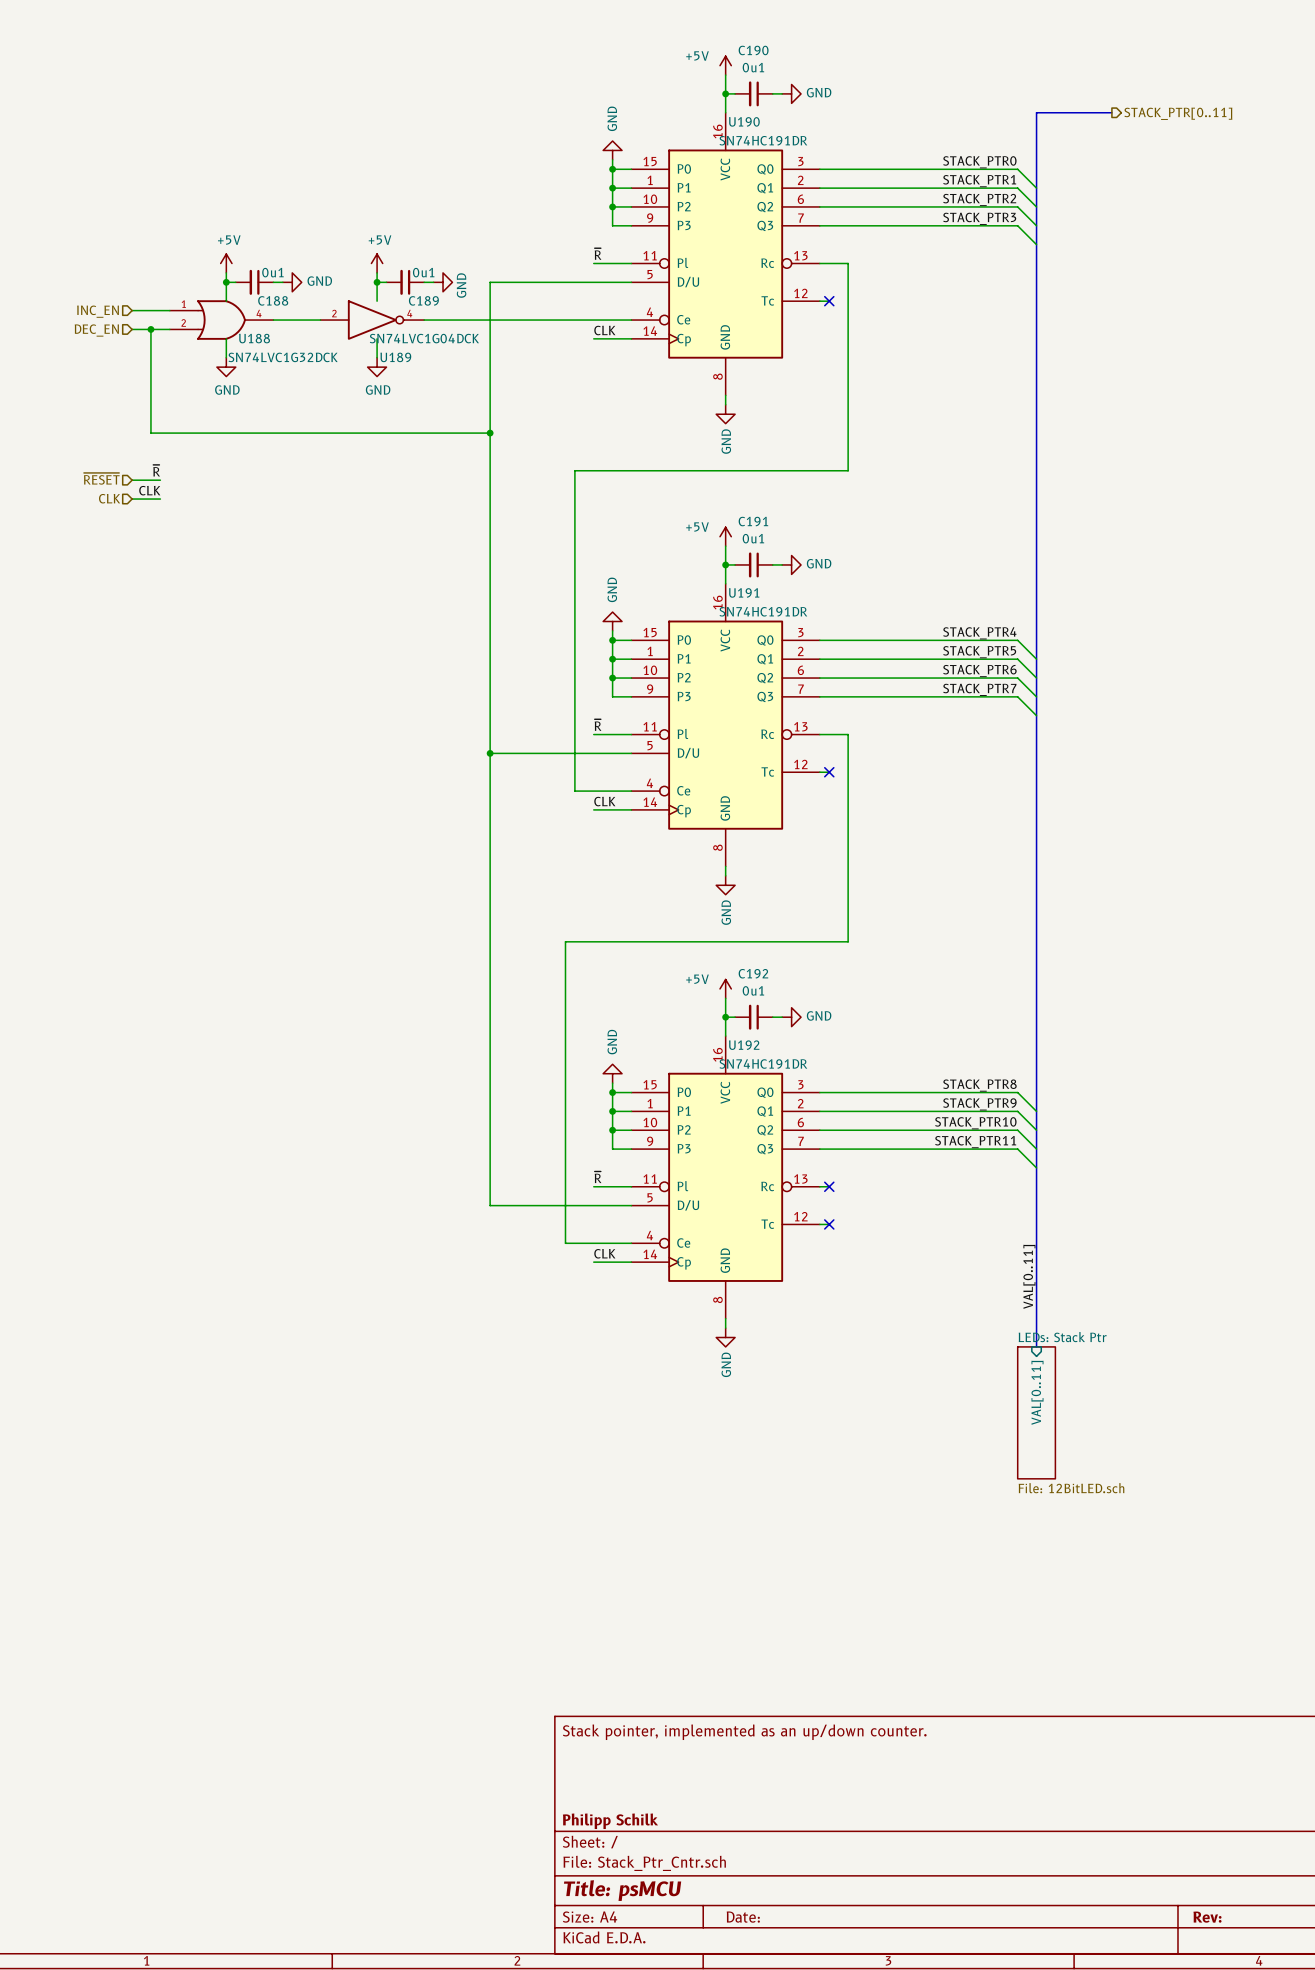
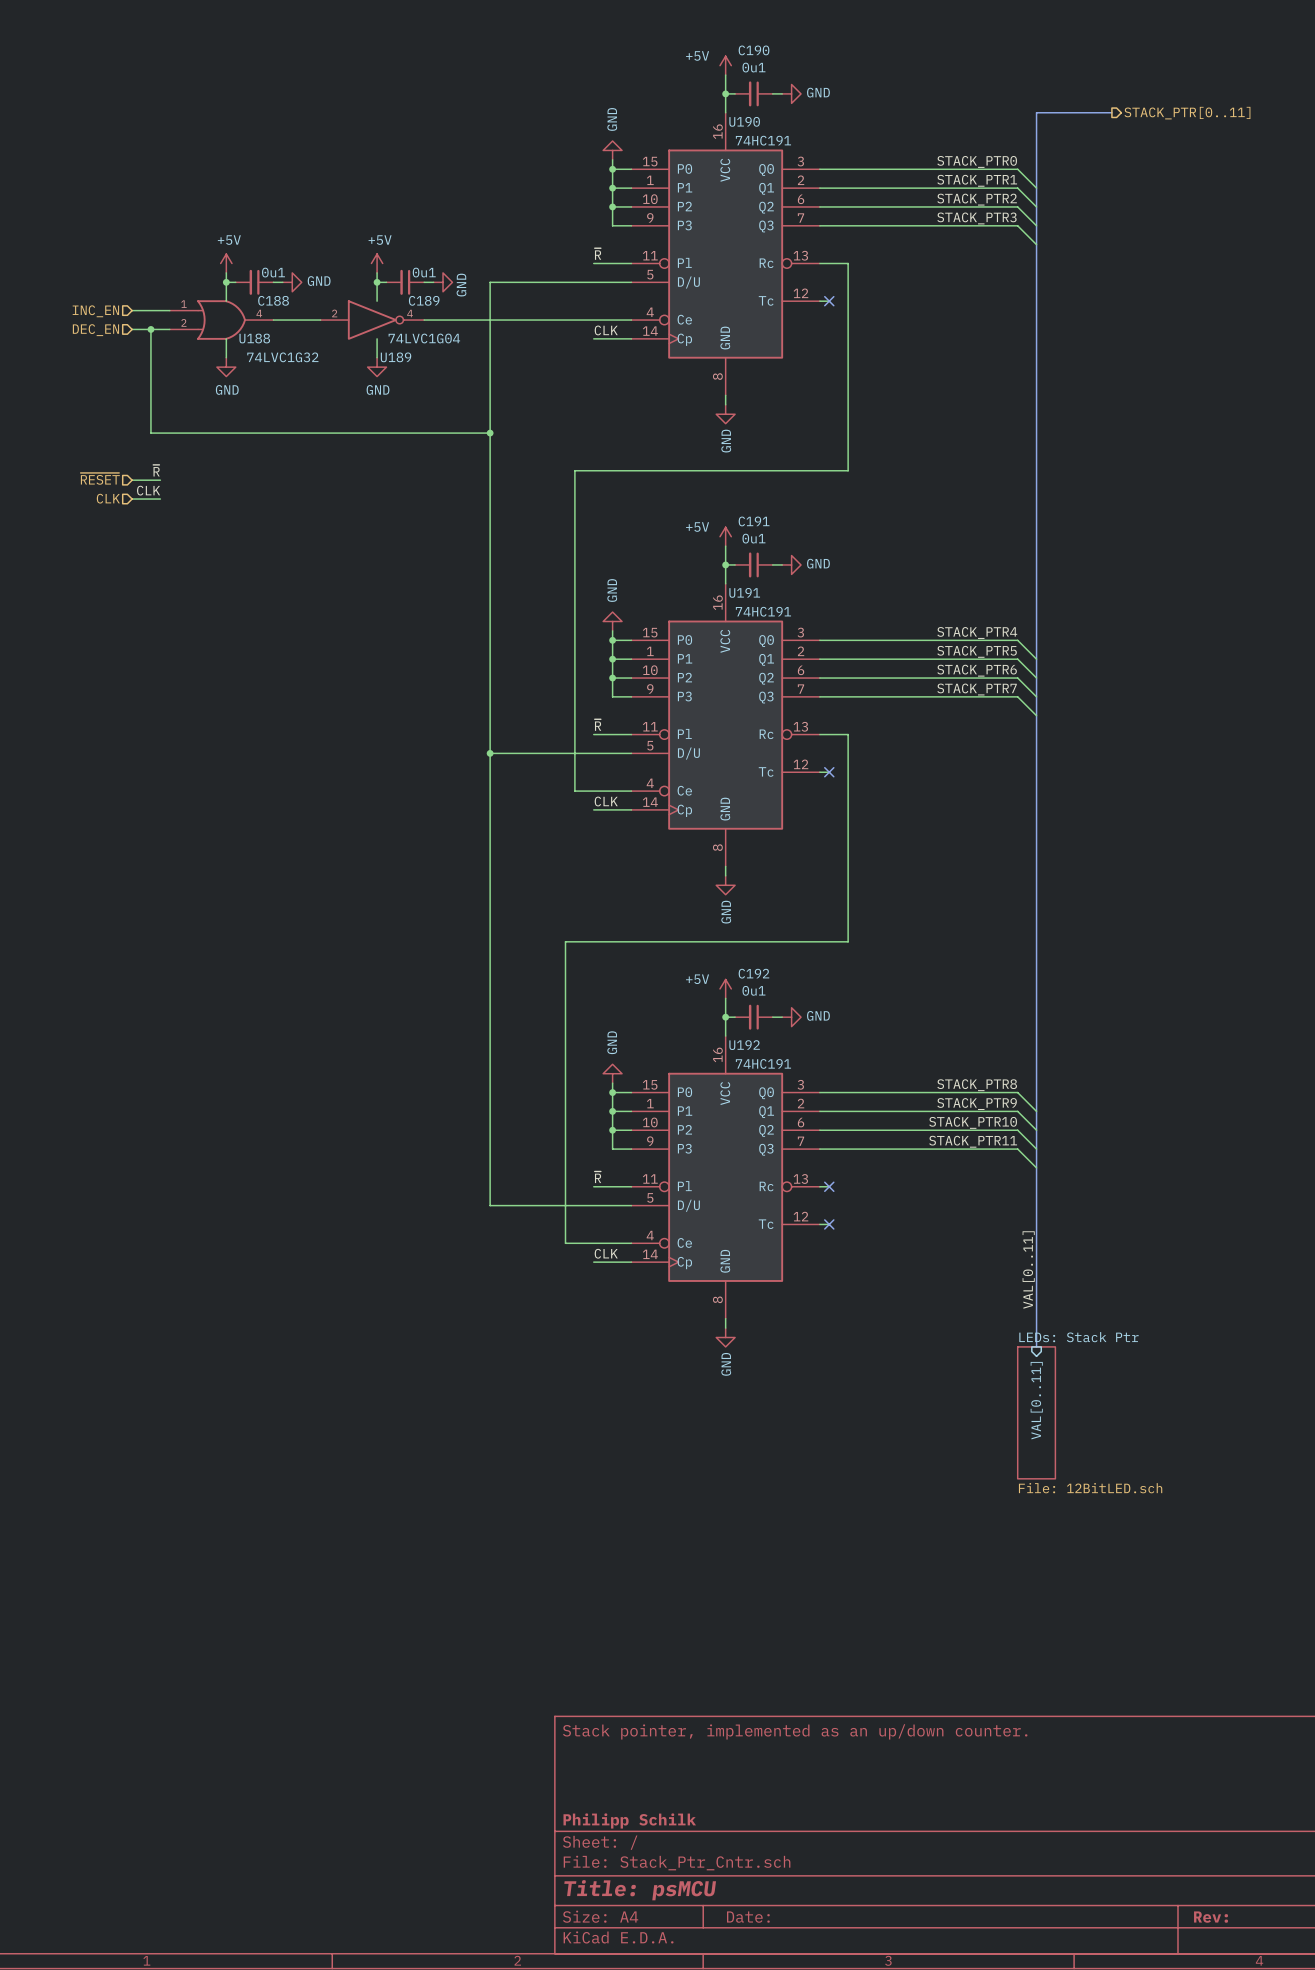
U190 value: SN74HC191DR (763, 140) -> 74HC191 (763, 140)
U189 value: SN74LVC1G04DCK (424, 338) -> 74LVC1G04 (424, 338)
U188 value: SN74LVC1G32DCK (283, 357) -> 74LVC1G32 (282, 357)
U191 value: SN74HC191DR (763, 611) -> 74HC191 (763, 611)
U192 value: SN74HC191DR (763, 1063) -> 74HC191 (763, 1063)

